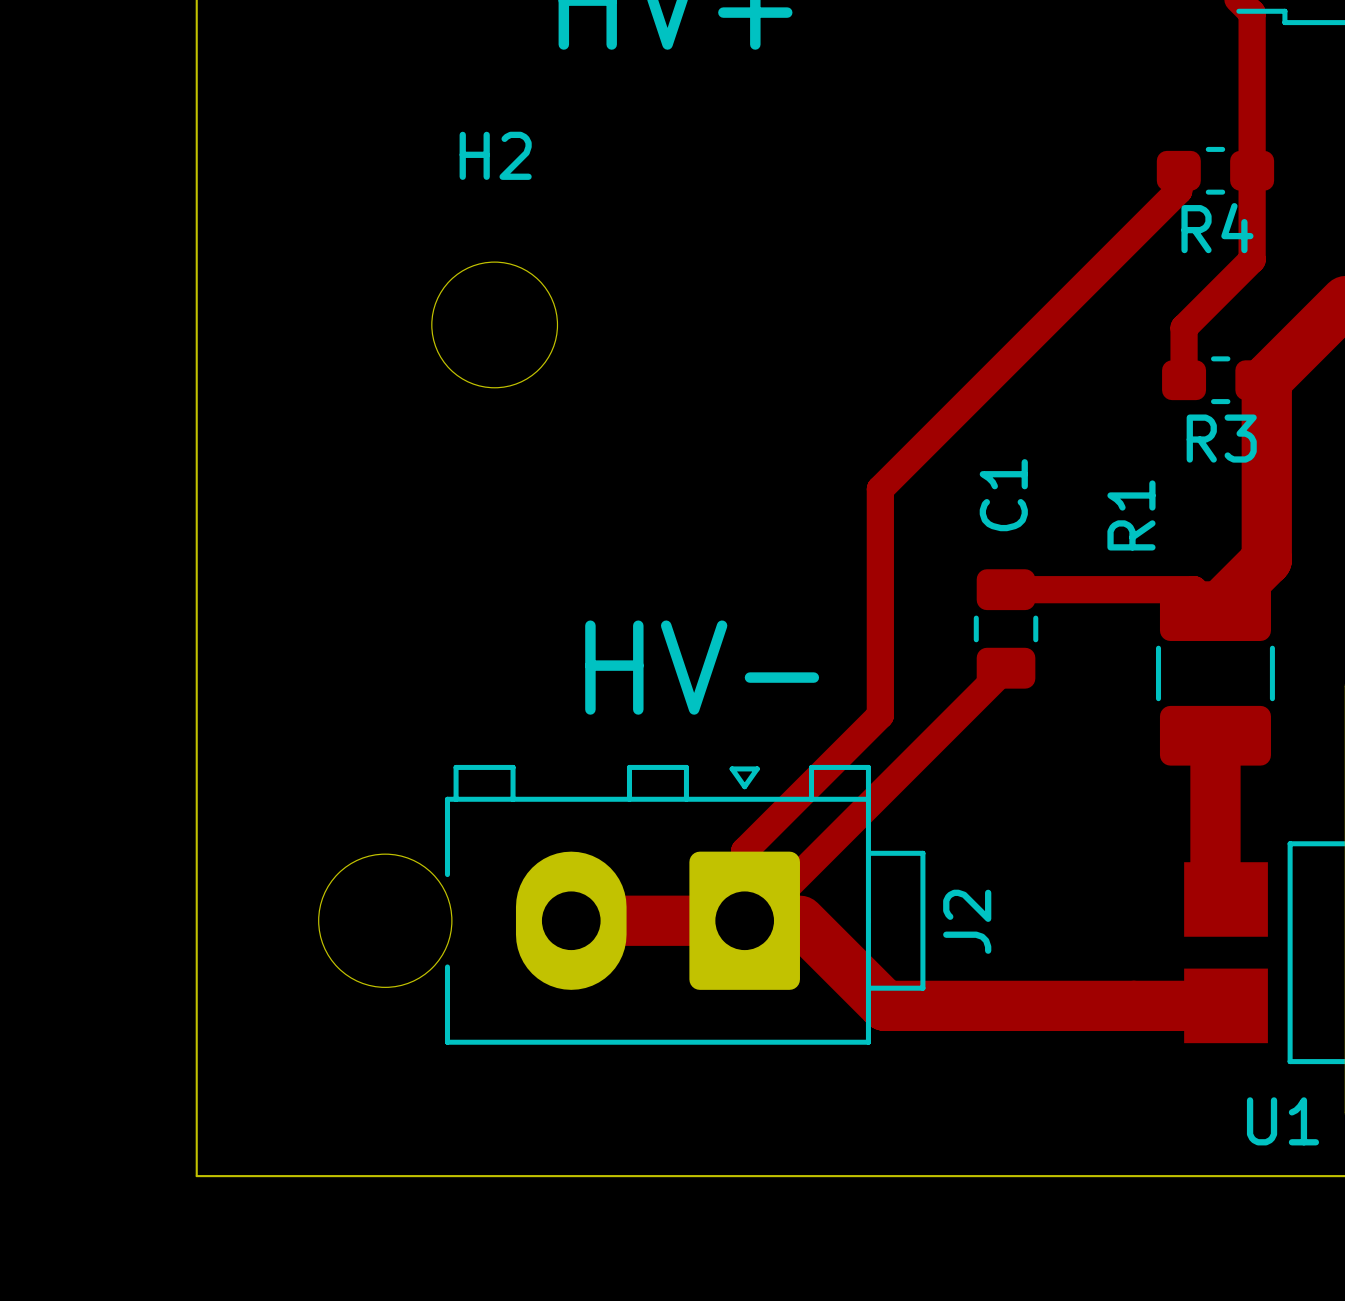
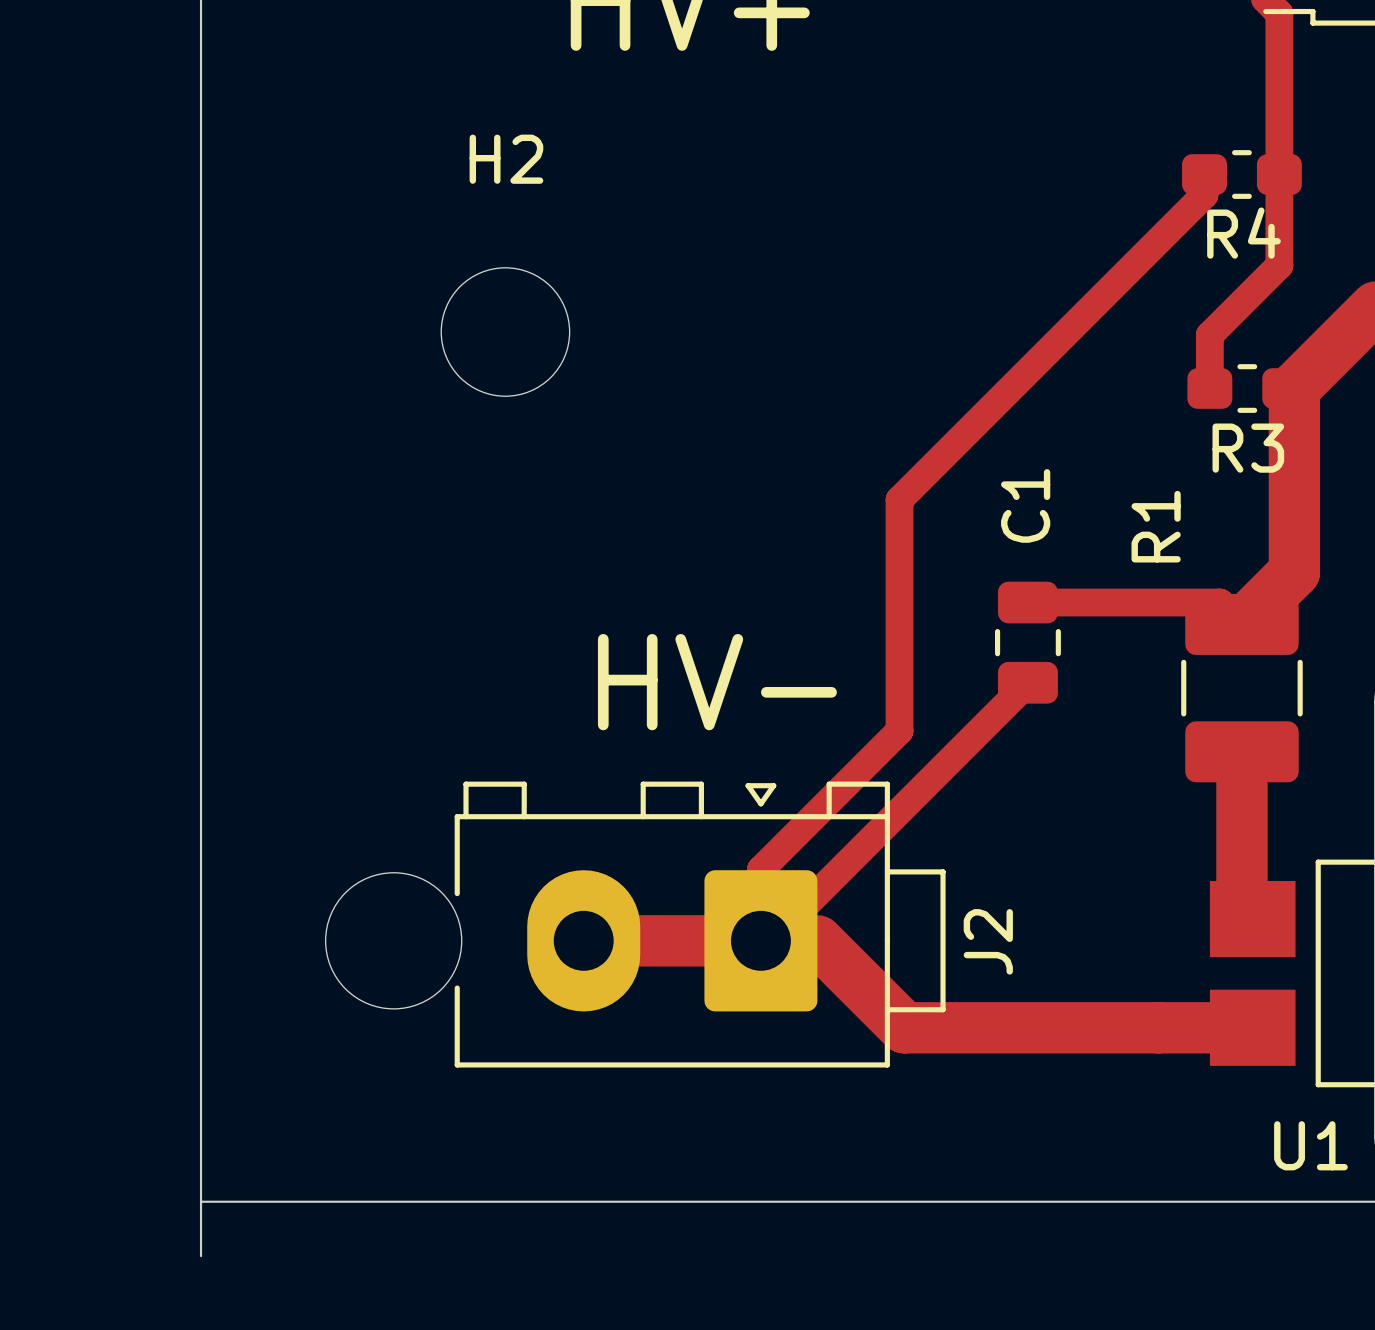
board edge: none -> (201, 1201) (201, 1256)

